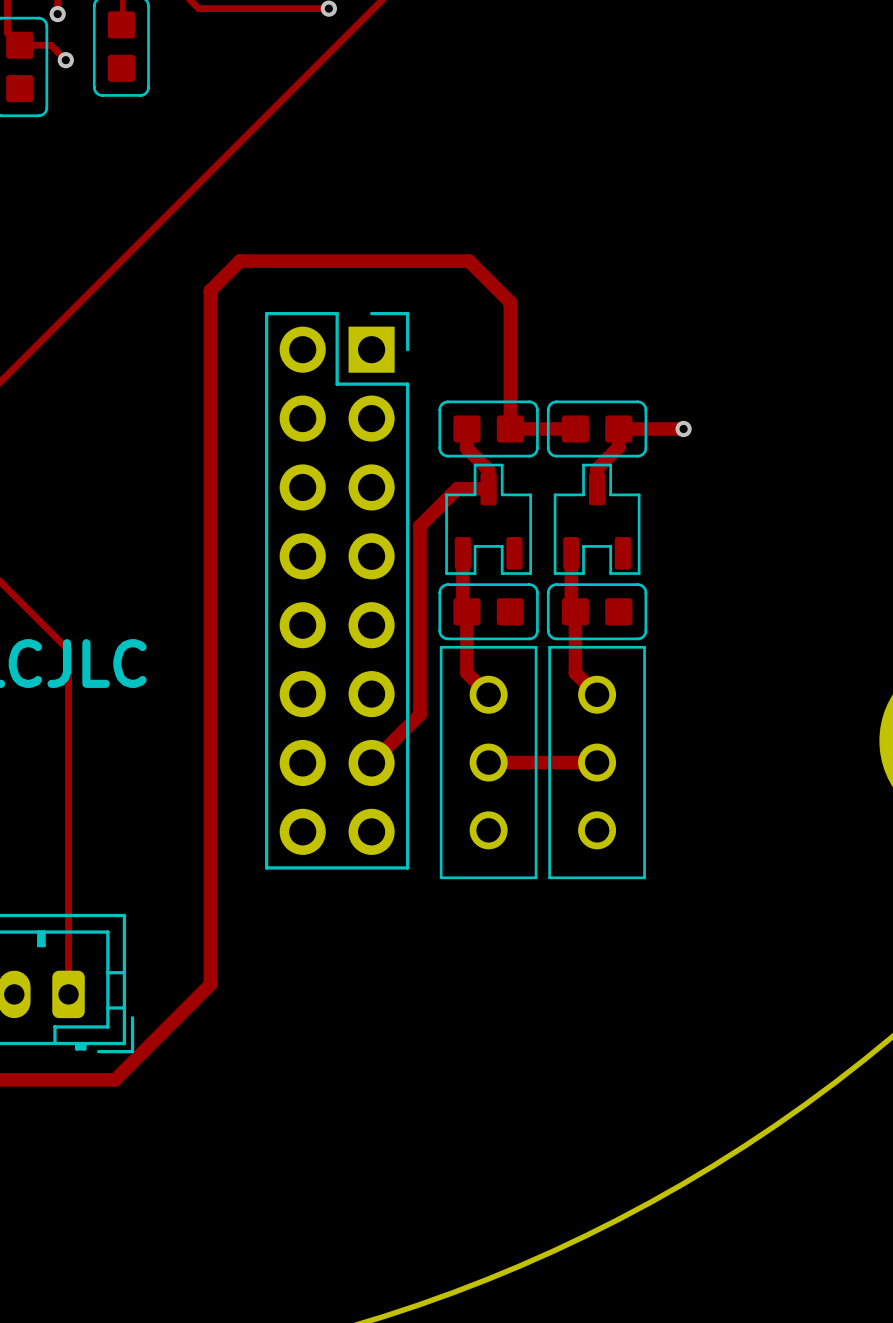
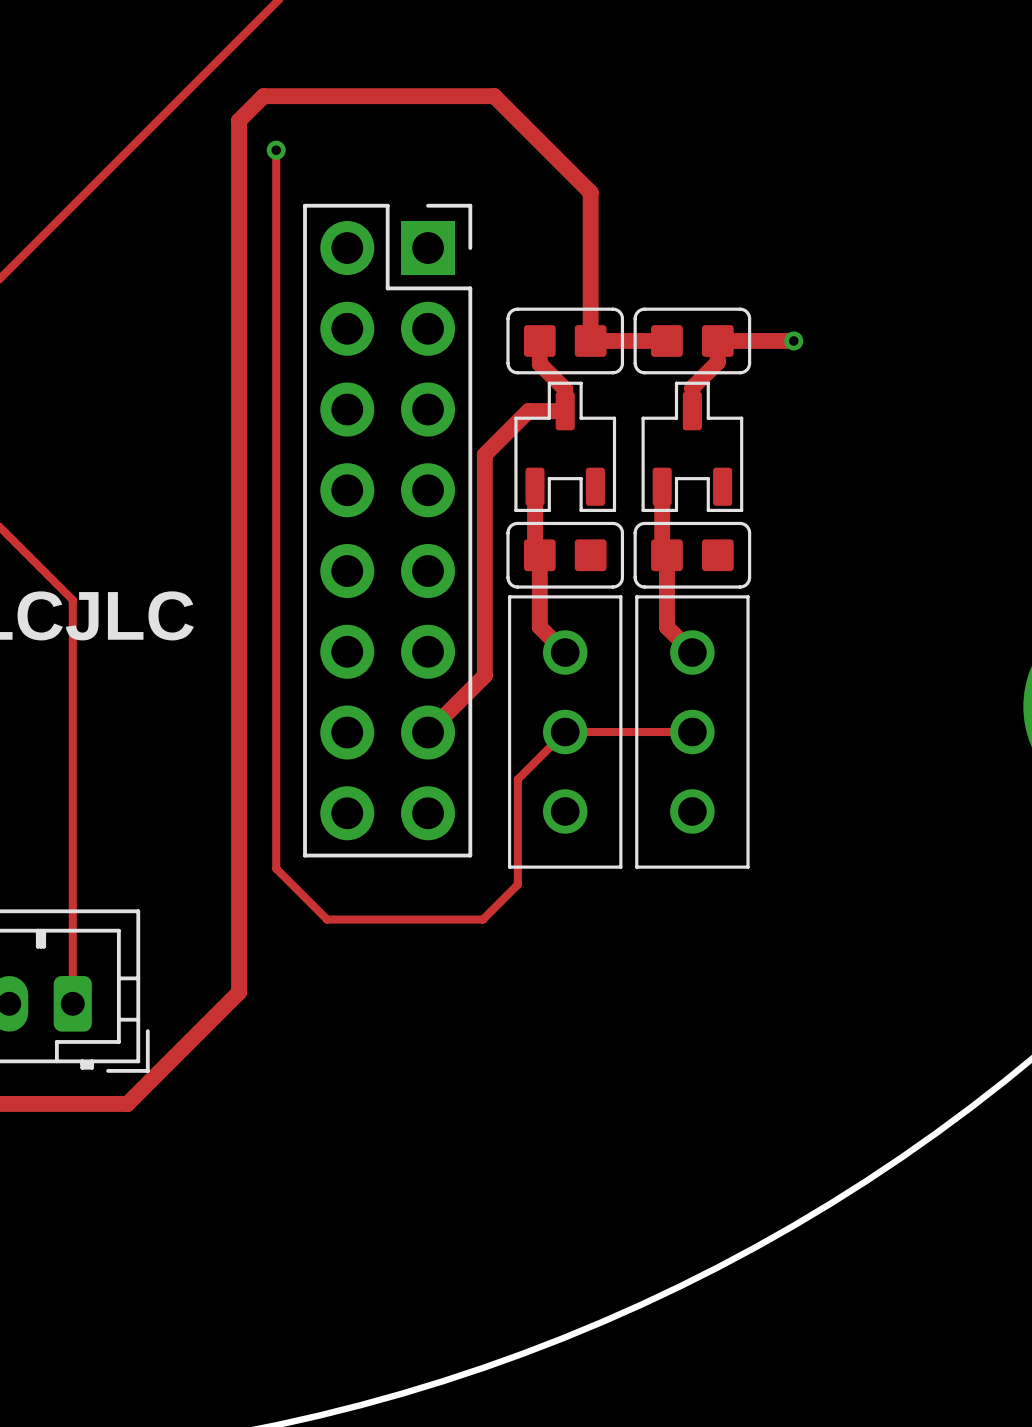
track: (469, 261) (239, 261) (210, 290) -> (542, 144) (494, 96) (263, 96) (239, 120) (239, 178)
track: none -> (276, 150) (276, 868) (327, 919) (482, 919) (517, 884) (517, 779) (565, 732)
via: none -> (276, 150)
track width: thick (488, 762) (597, 762) -> thin (565, 732) (692, 732)

